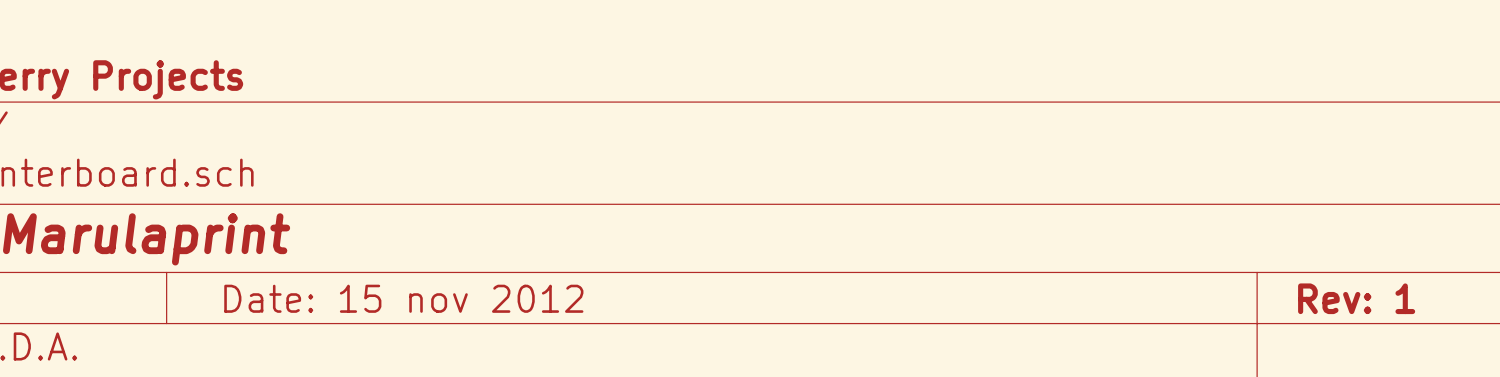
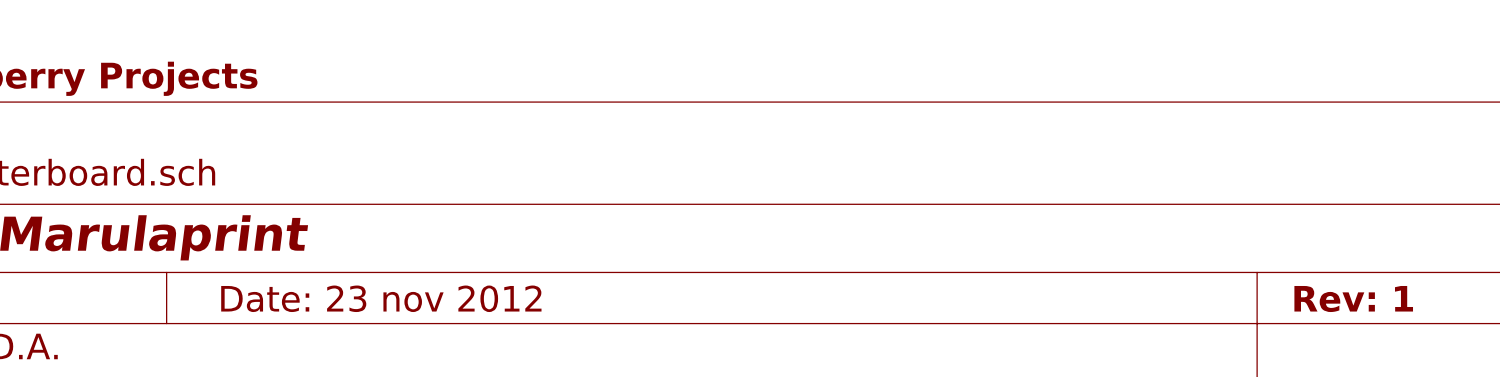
title block: Date: 15 nov 2012 (403, 298) -> Date: 23 nov 2012 (381, 298)

